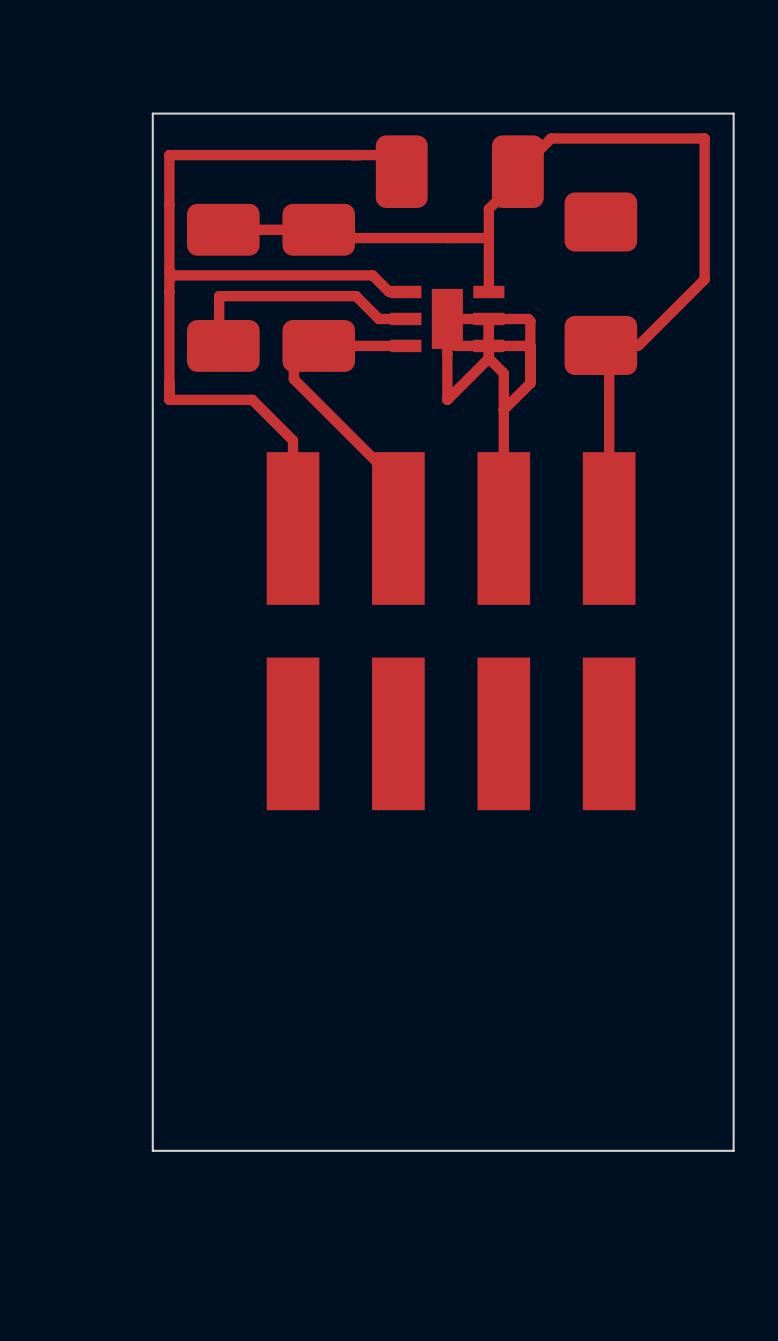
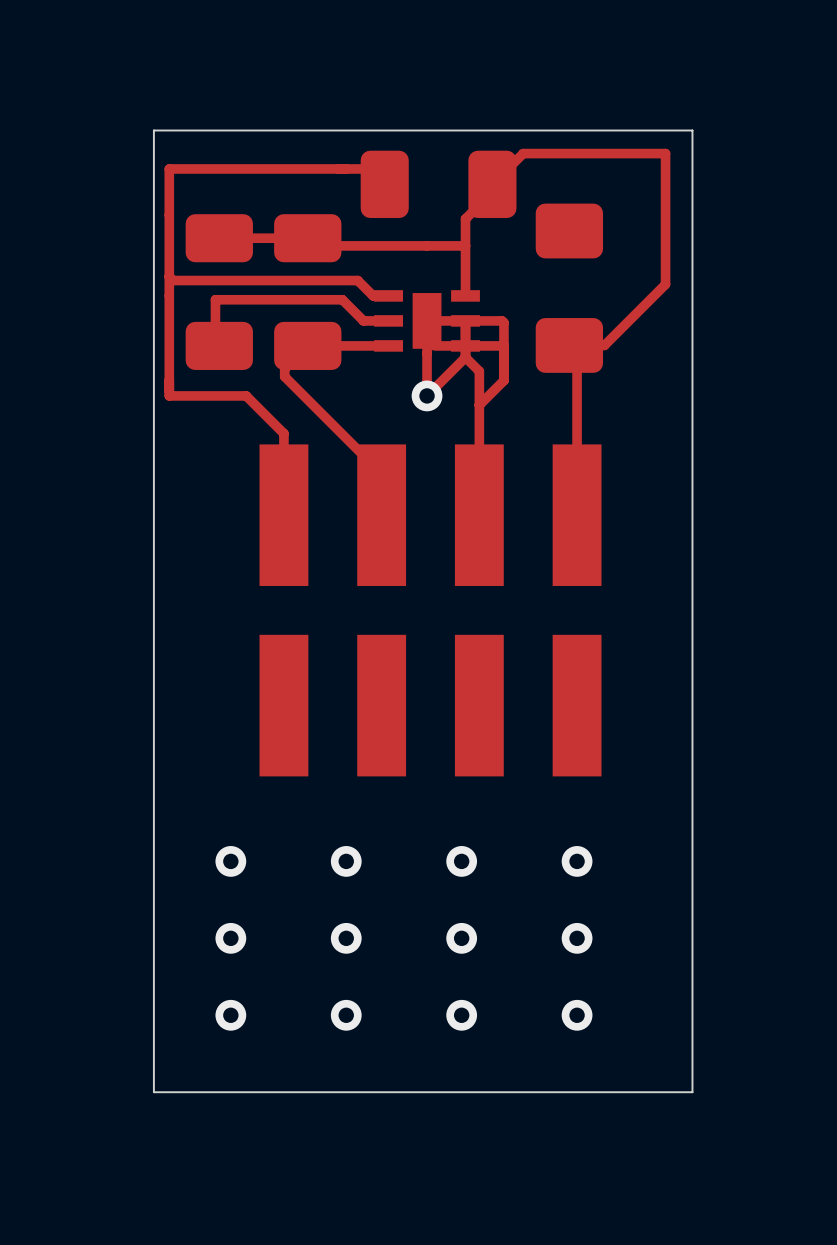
via: none -> (427, 395)
via: none -> (230, 861)
via: none -> (346, 861)
via: none -> (461, 861)
via: none -> (577, 861)
via: none -> (230, 938)
via: none -> (346, 938)
via: none -> (461, 938)
via: none -> (577, 938)
via: none -> (230, 1015)
via: none -> (346, 1015)
via: none -> (461, 1015)
via: none -> (577, 1015)

